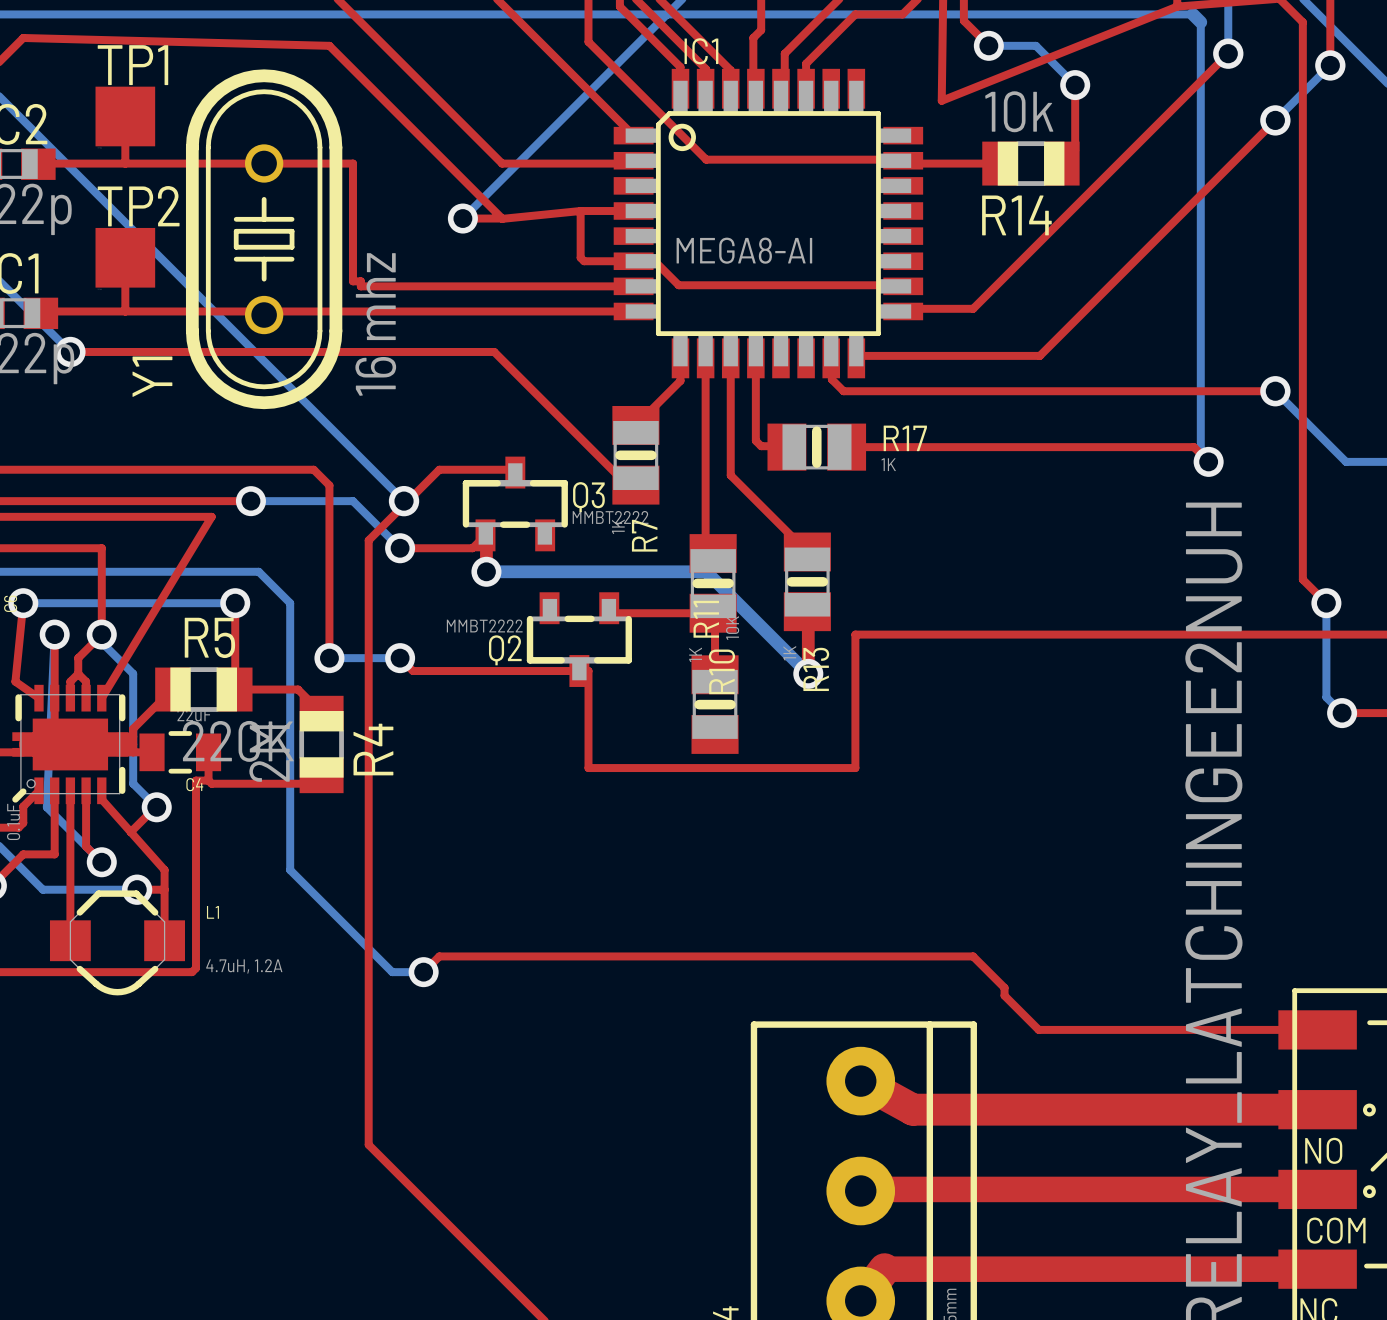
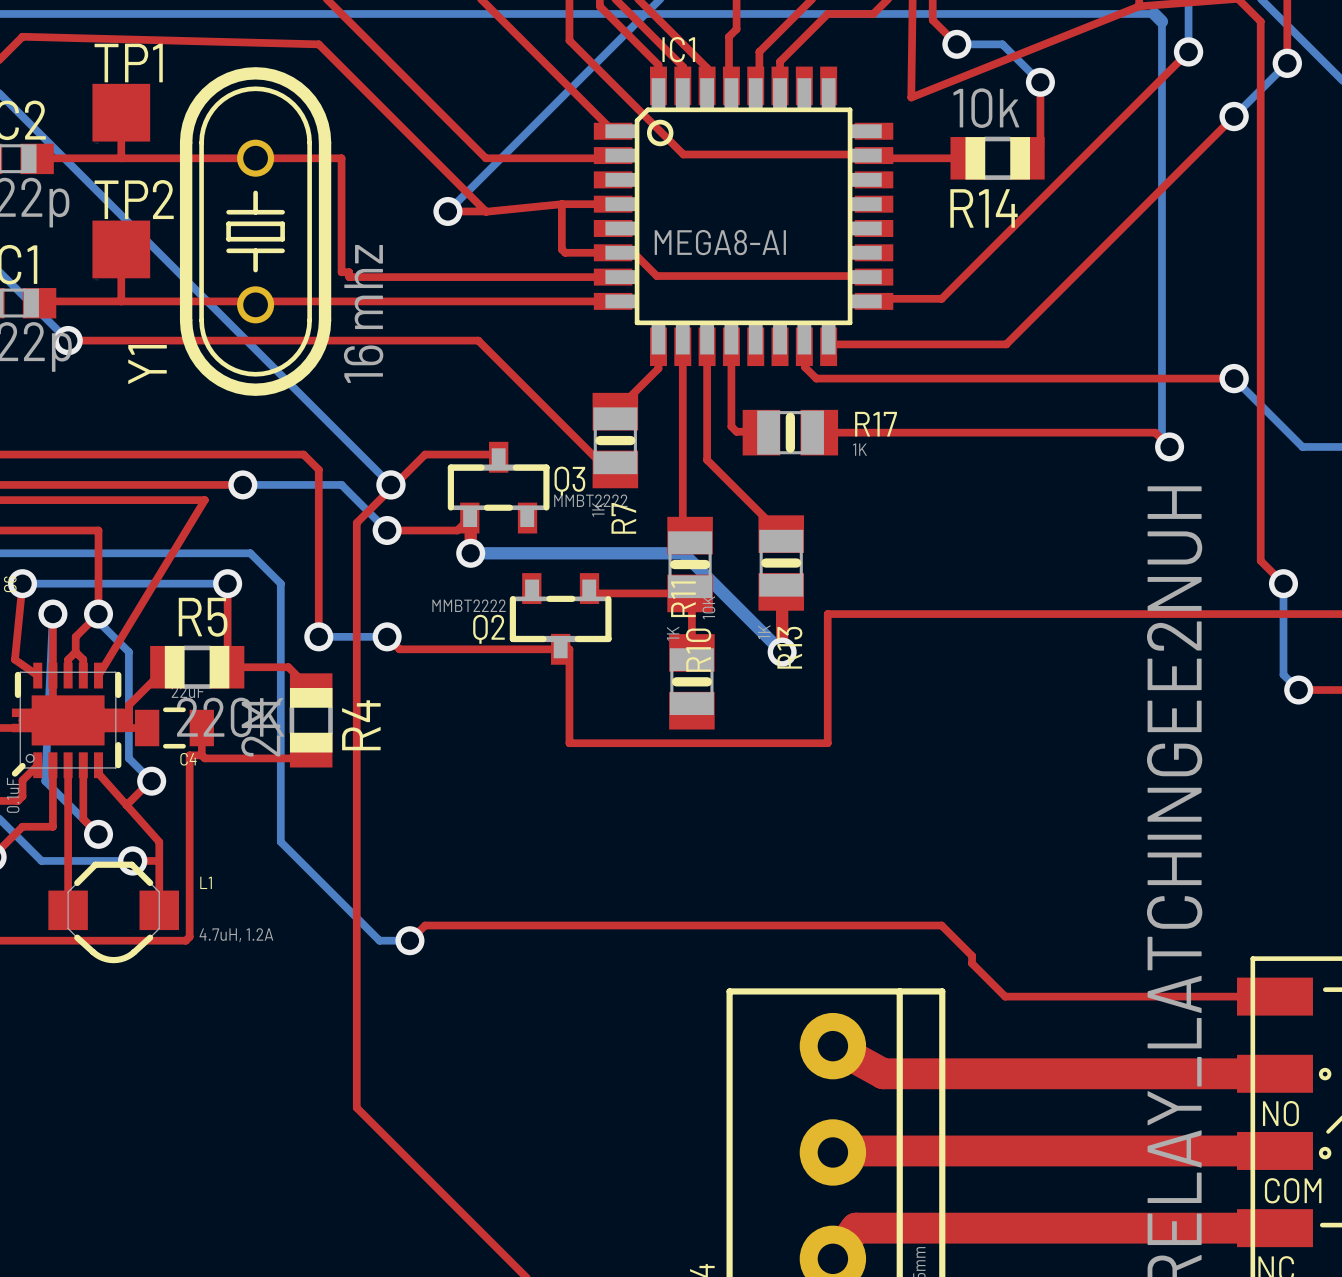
top track width: thin (882, 1189) (1317, 1189) -> thick (854, 1150) (1274, 1150)
top track width: thin (884, 1269) (1317, 1269) -> thick (855, 1228) (1274, 1228)

